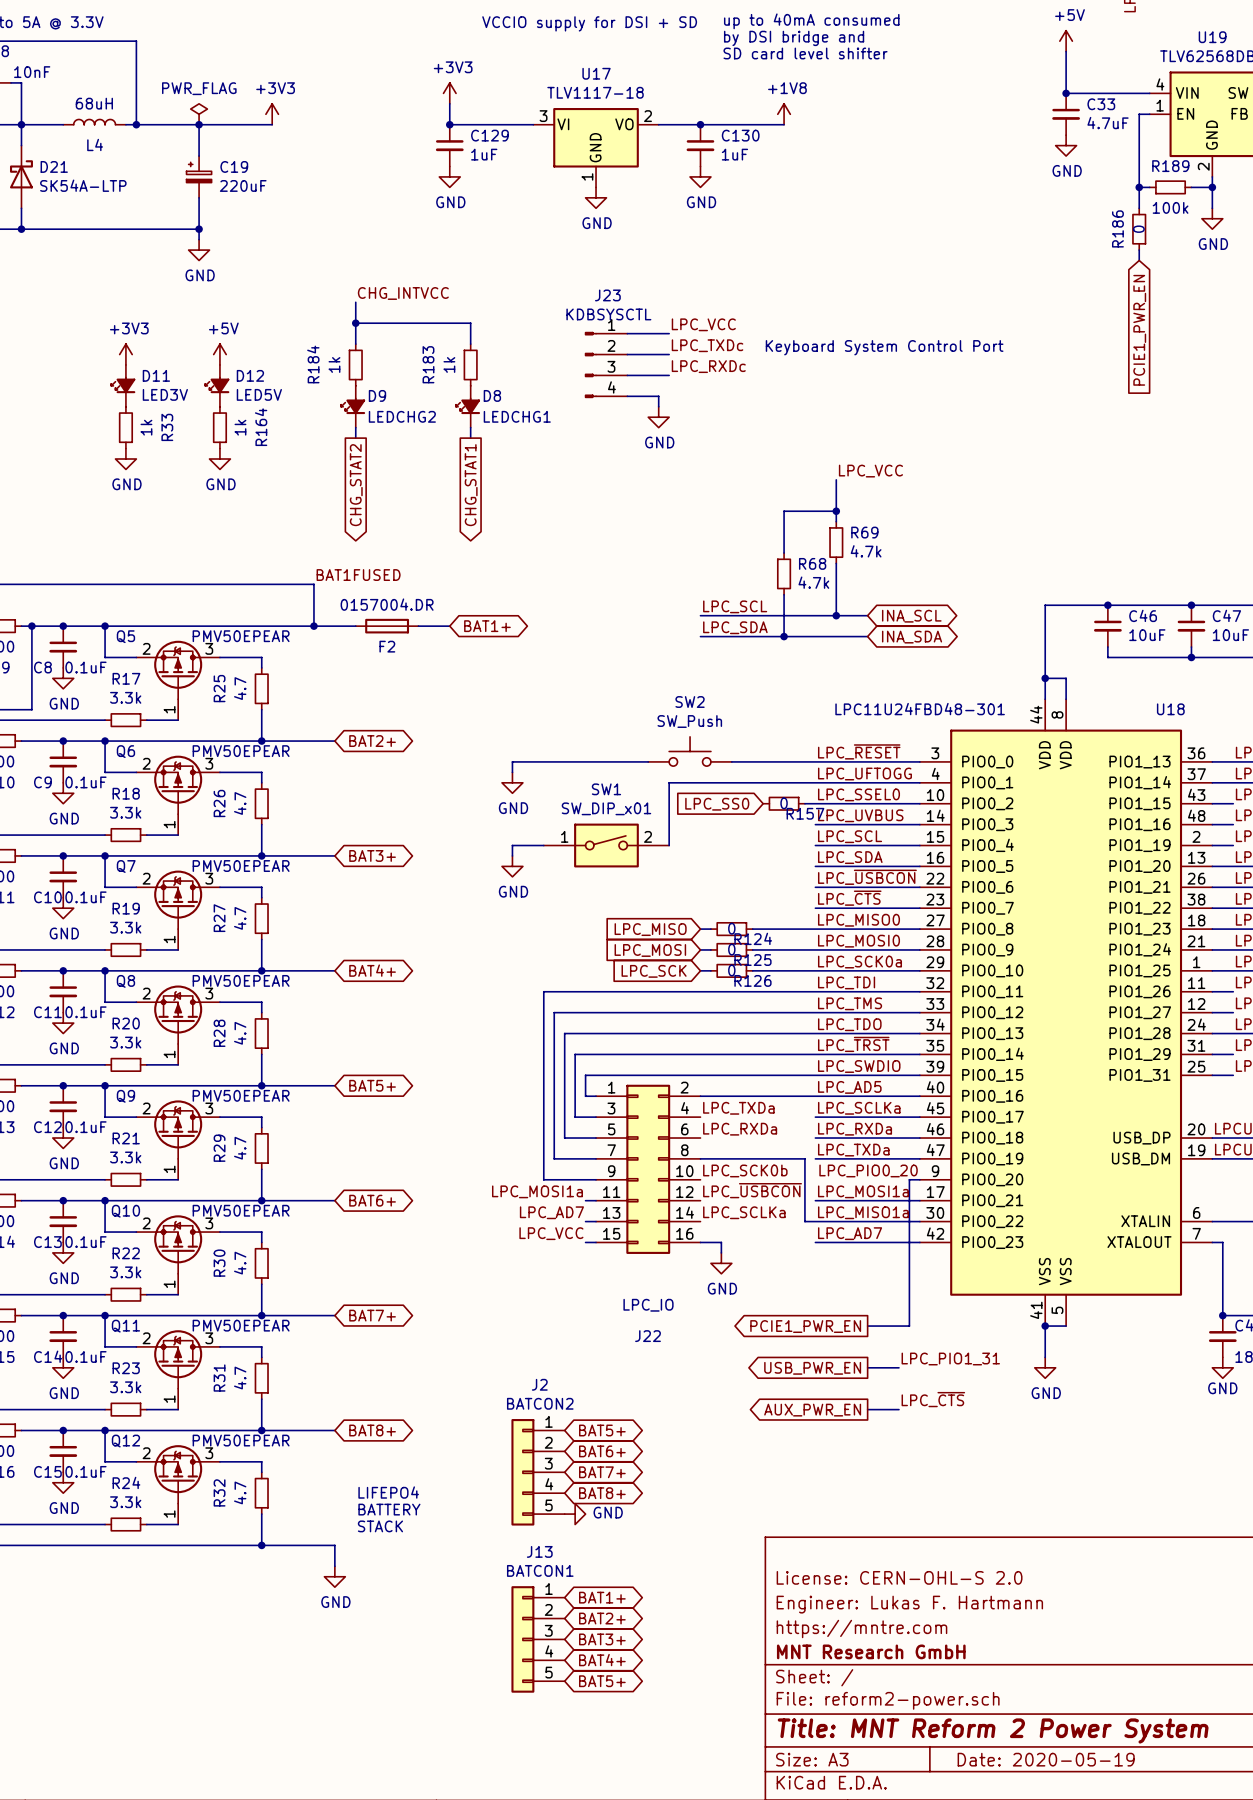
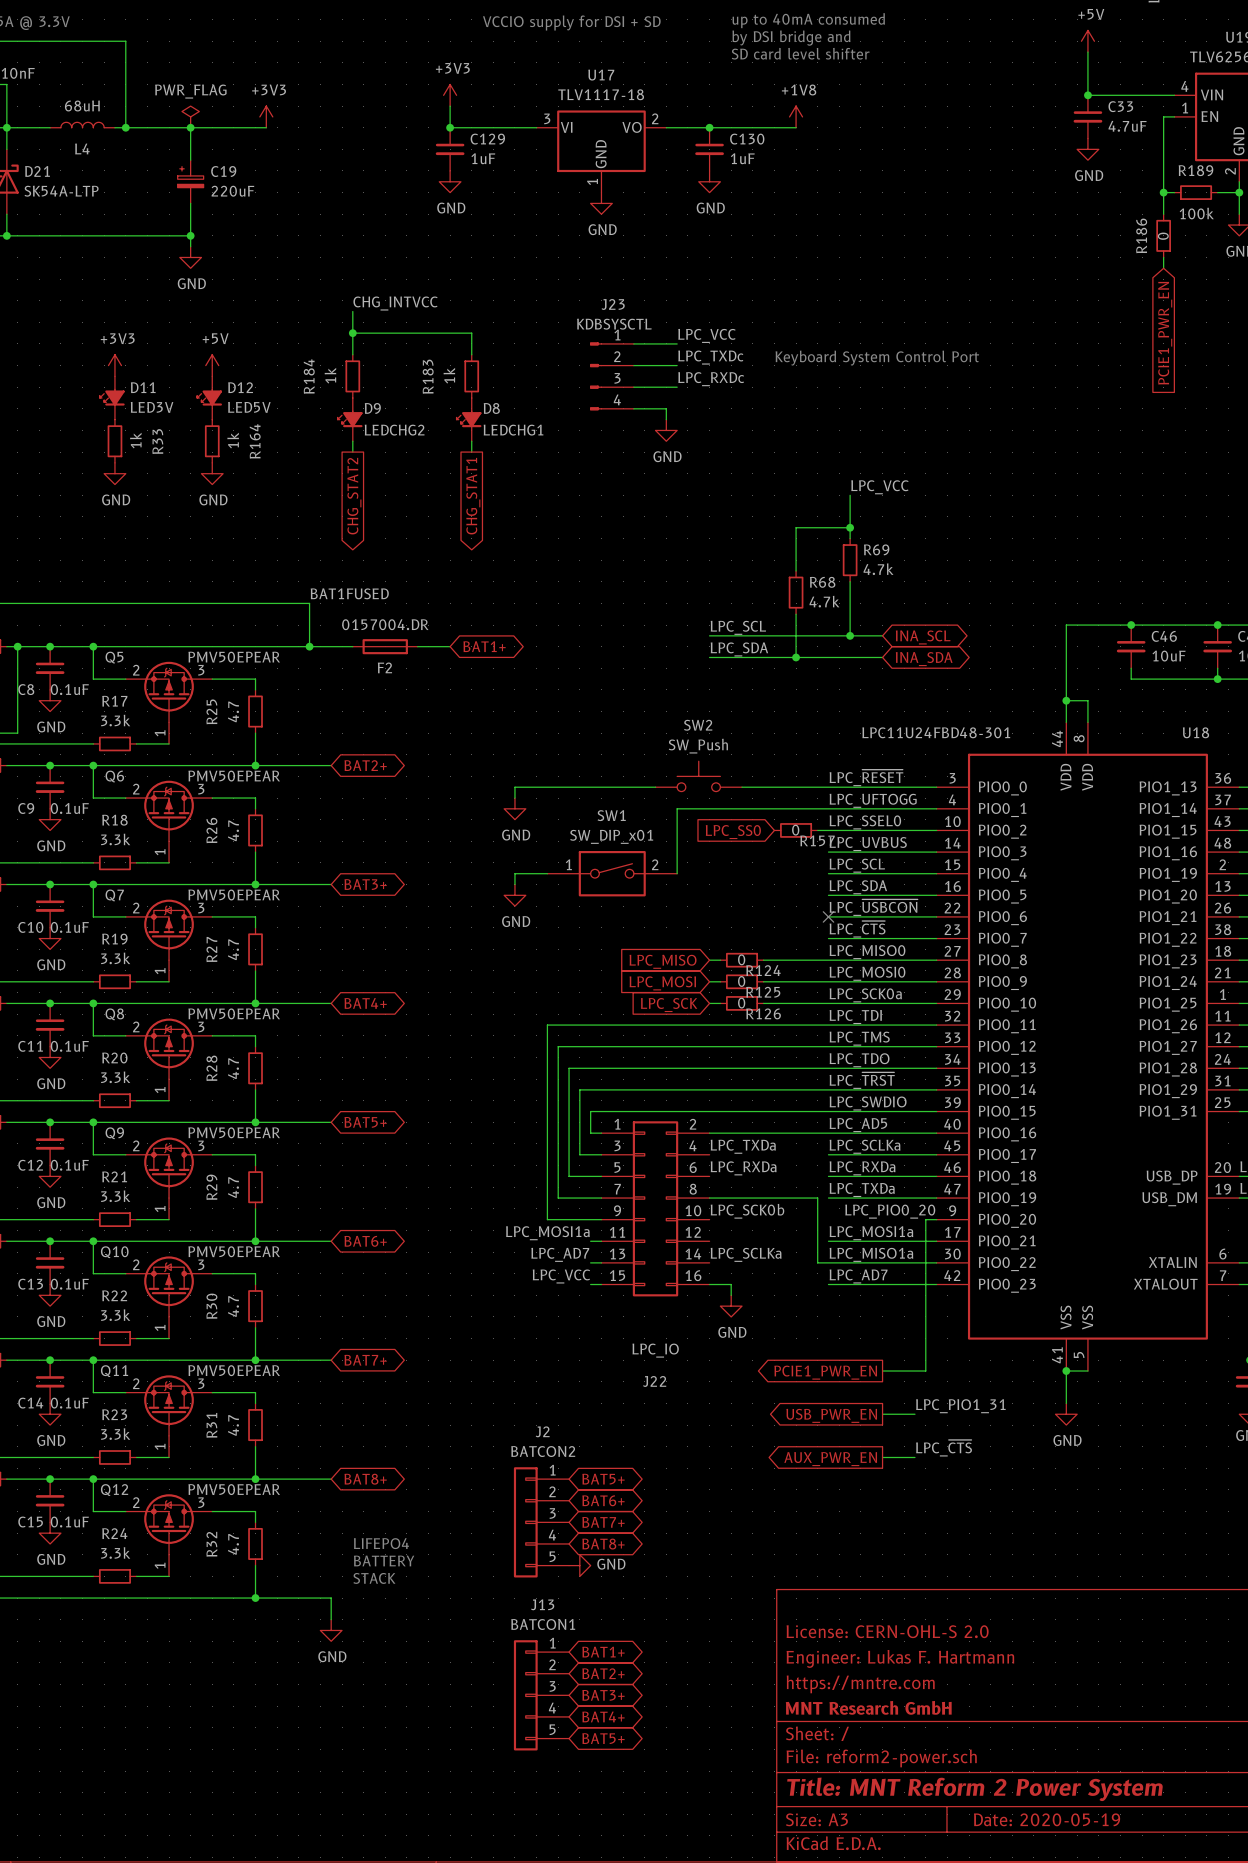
no-connect mark: none -> (828, 916)
label: LPC_~{USBCON} (752, 1190) -> none

